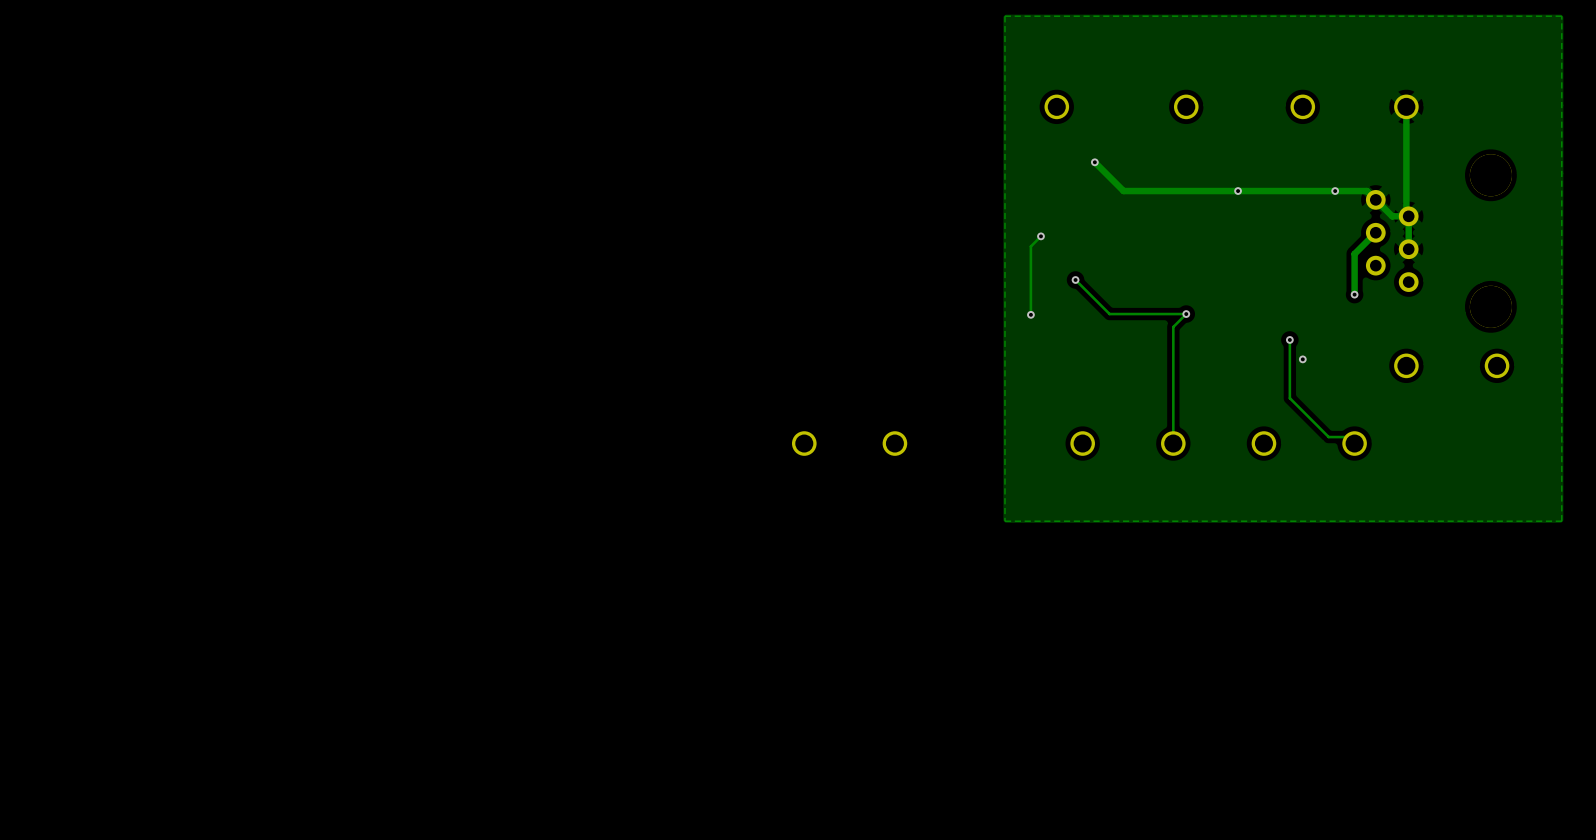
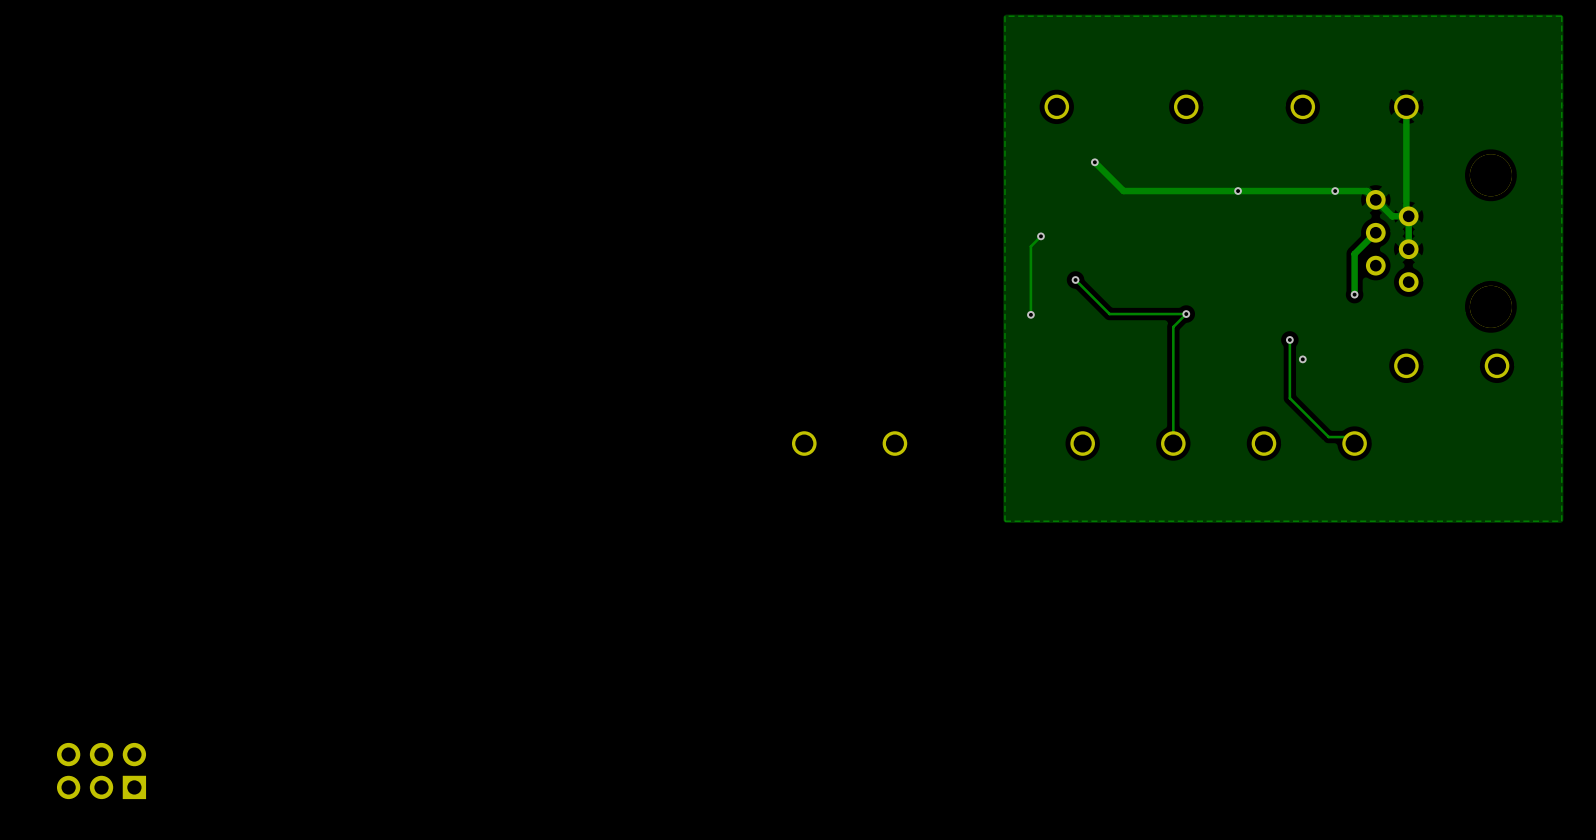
part: none -> (101, 771)

